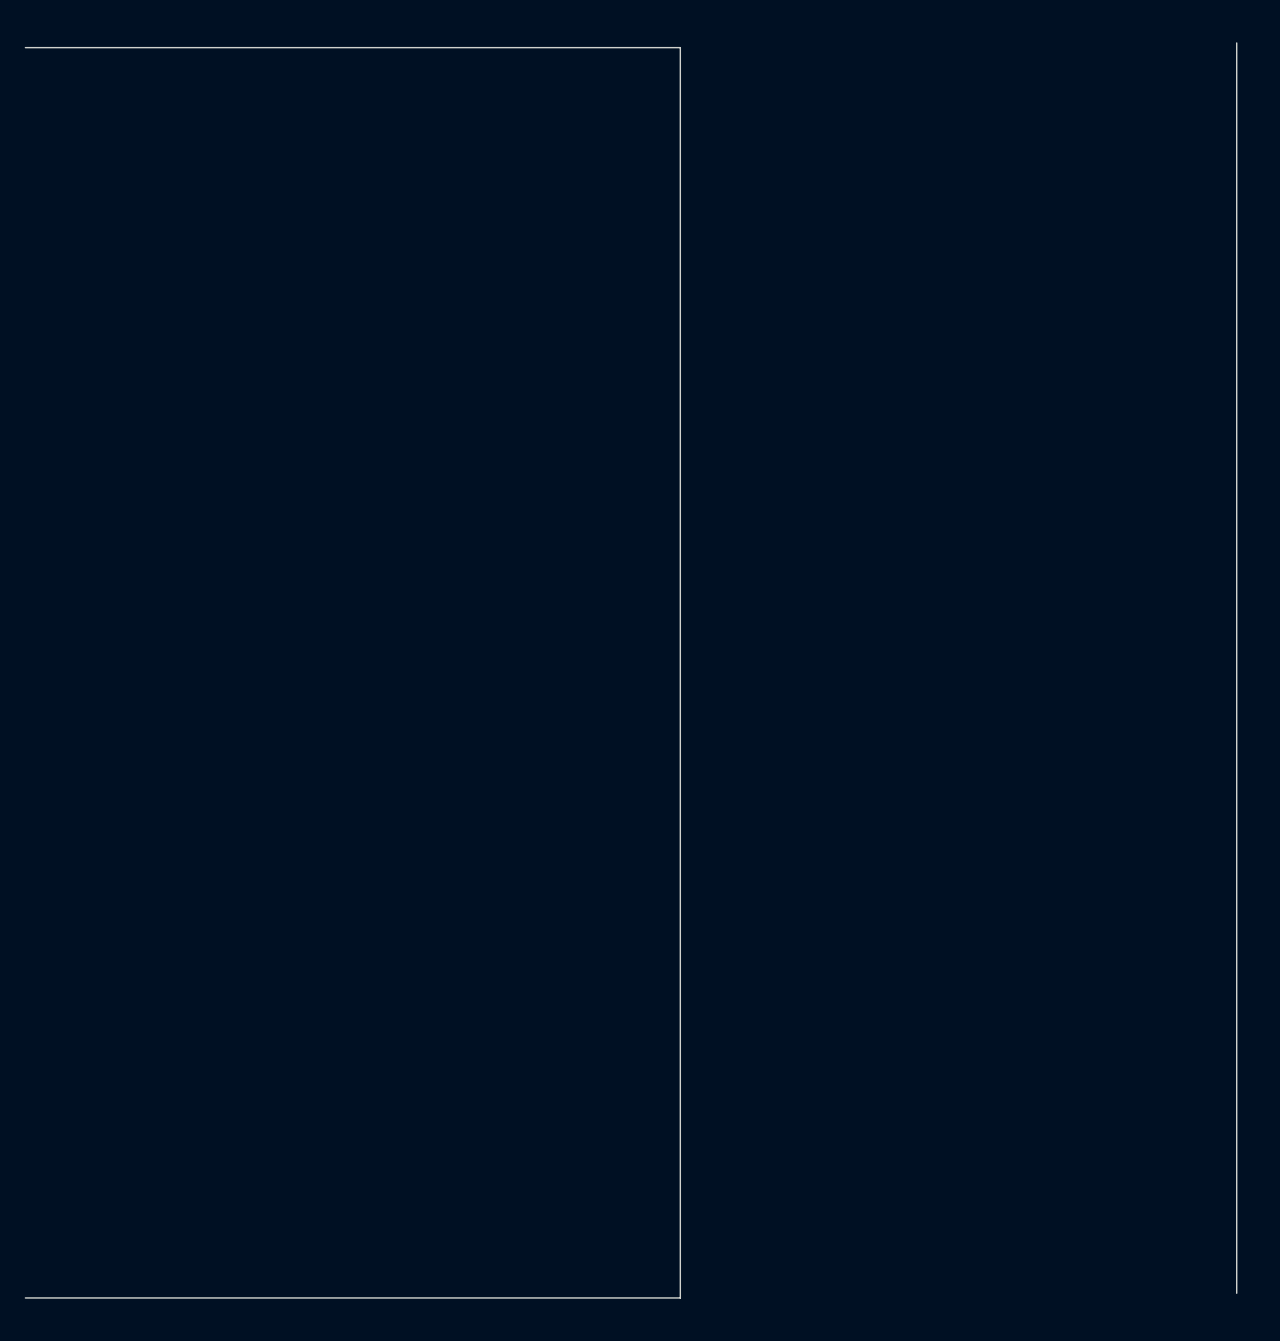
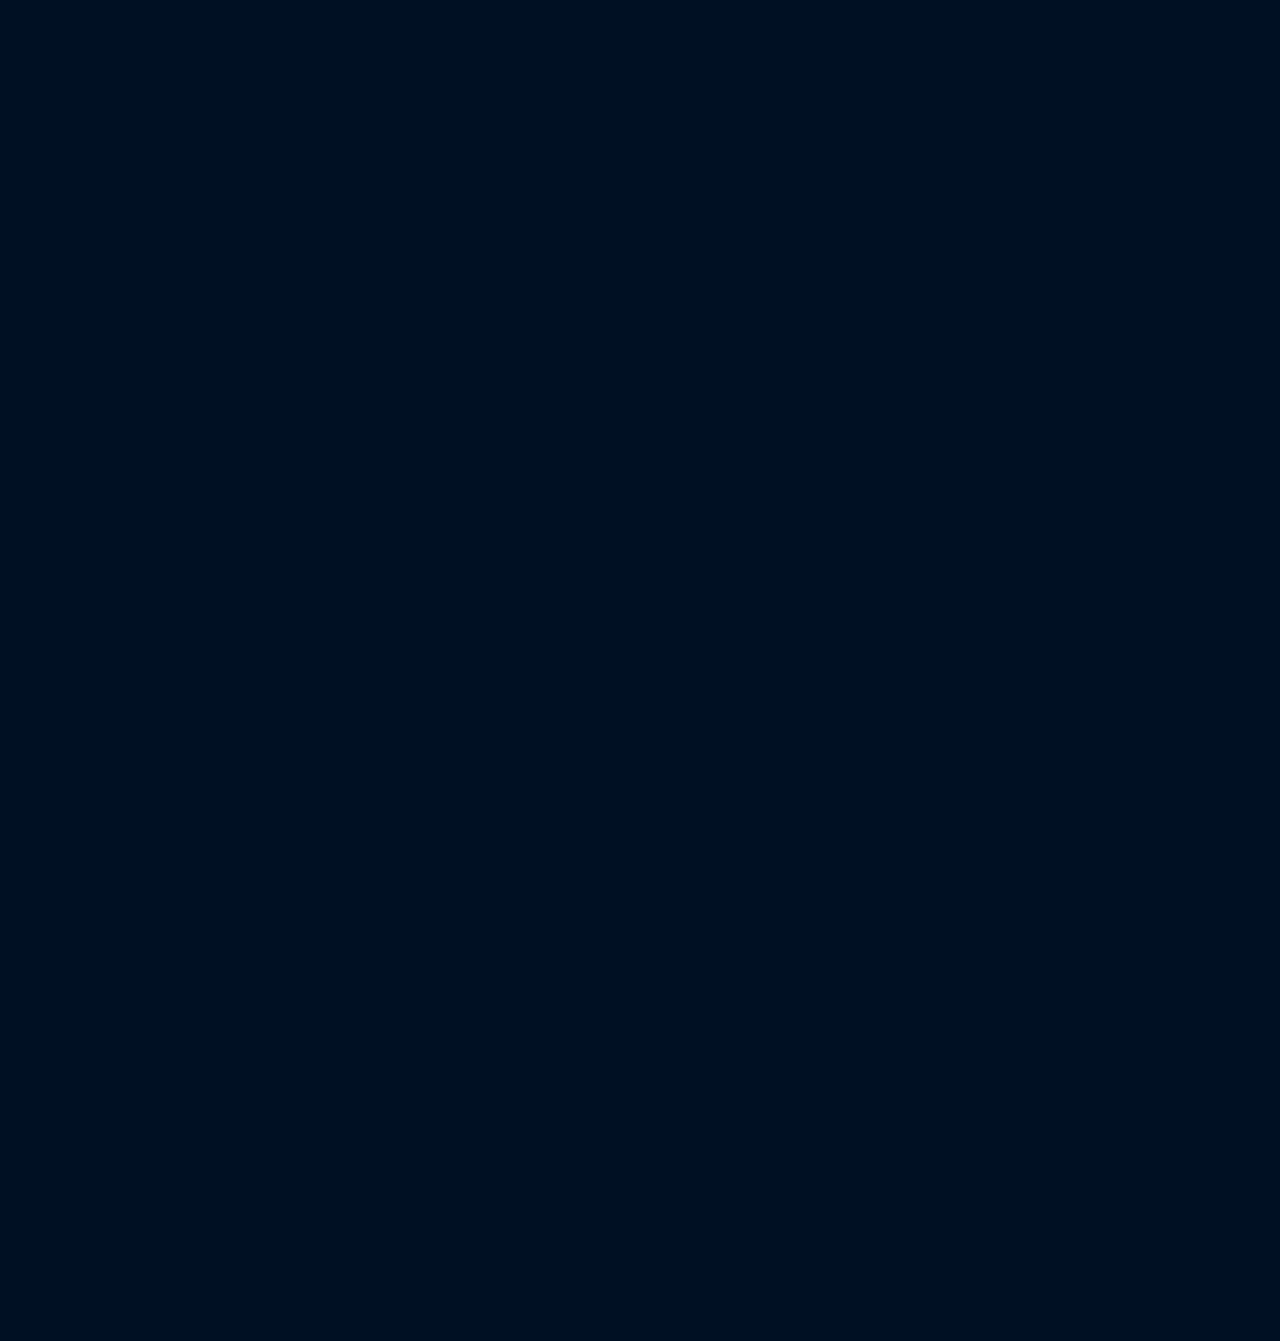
board edge: (1236, 42) (1236, 1293) -> none
board edge: (25, 47) (680, 47) (680, 1297) (25, 1297) -> none

